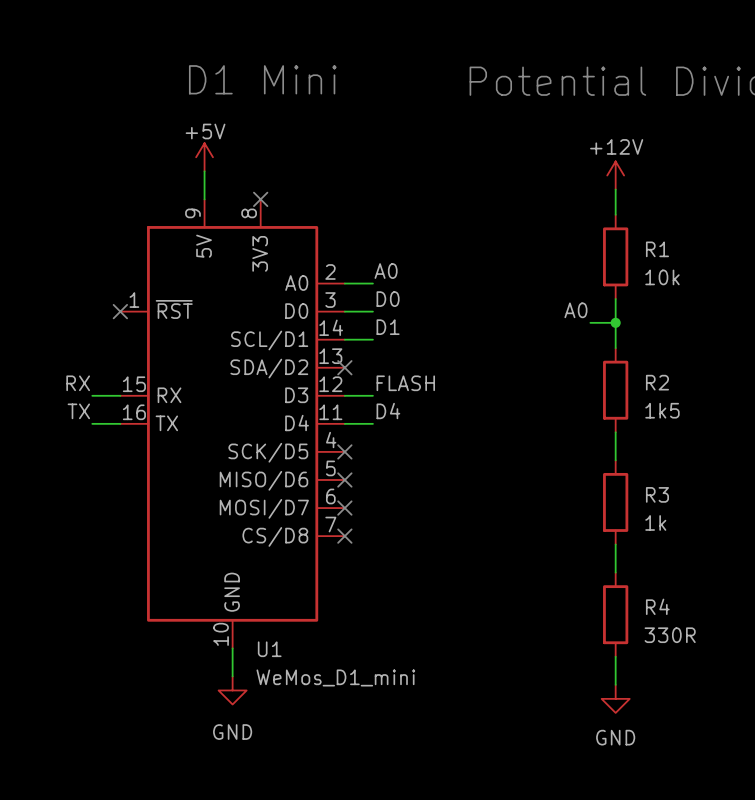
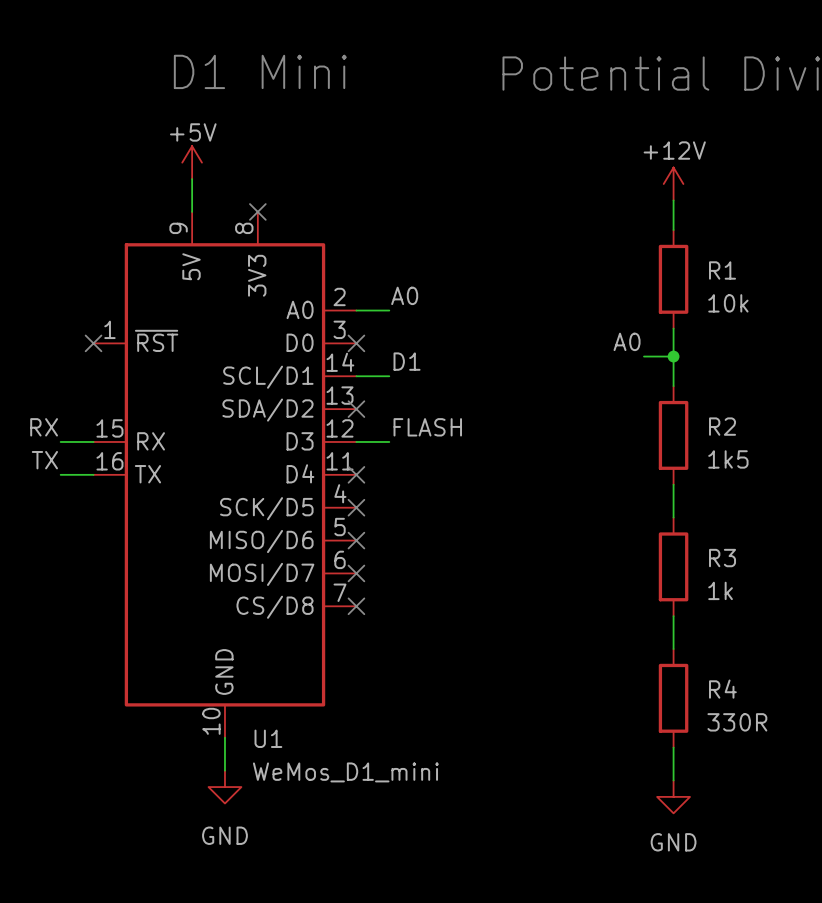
label: D0 (388, 299) -> none
wire: (344, 311) (372, 311) -> none
no-connect mark: none -> (356, 343)
label: D4 (388, 411) -> none
wire: (344, 423) (372, 423) -> none
no-connect mark: none -> (356, 474)

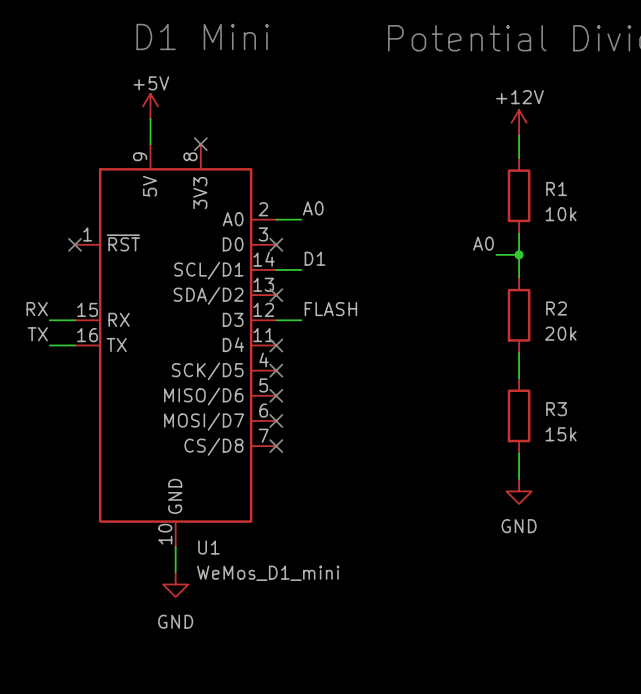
R2 value: 1k5 (728, 459) -> 20k (560, 333)
R3 value: 1k (720, 590) -> 15k (561, 434)
R4: 330R (673, 698) -> none
wire: (673, 747) (673, 780) -> none
power symbol position: GND (673, 796) -> GND (519, 491)

